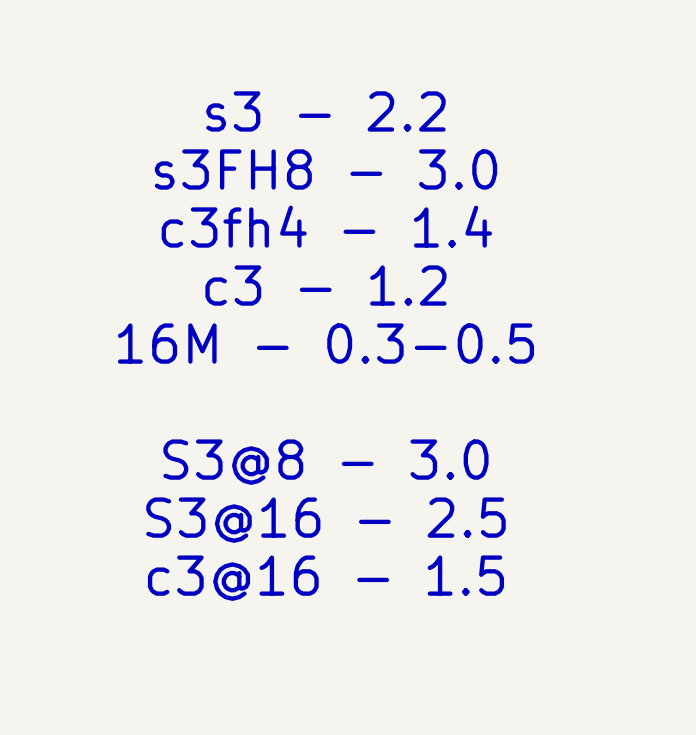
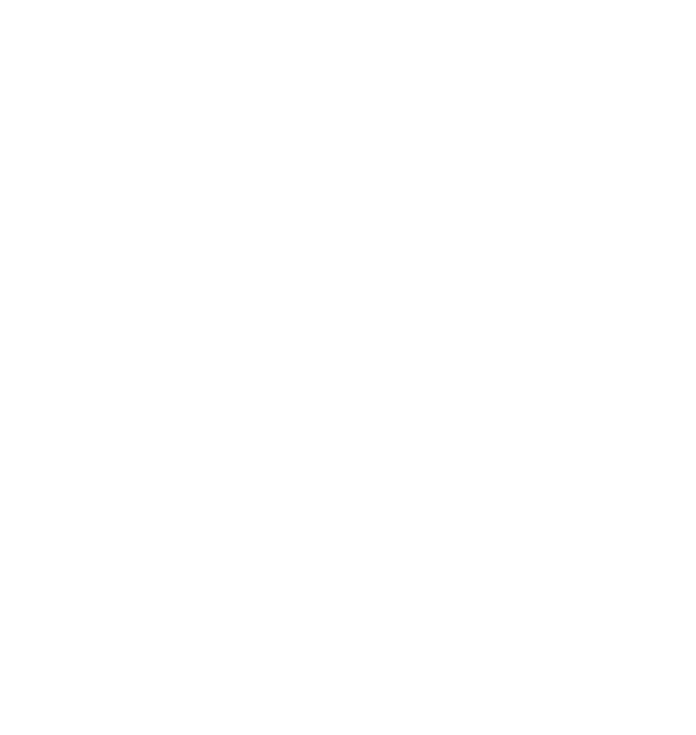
text: s3 - 2.2 (325, 111) -> none
text: s3FH8 - 3.0 (325, 169) -> none
text: c3fh4 - 1.4 (326, 226) -> none
text: c3 - 1.2 (325, 285) -> none
text: 16M - 0.3-0.5 (325, 343) -> none
text: S3@8 - 3.0 (325, 462) -> none
text: S3@16 - 2.5 (325, 520) -> none
text: c3@16 - 1.5 (325, 578) -> none

